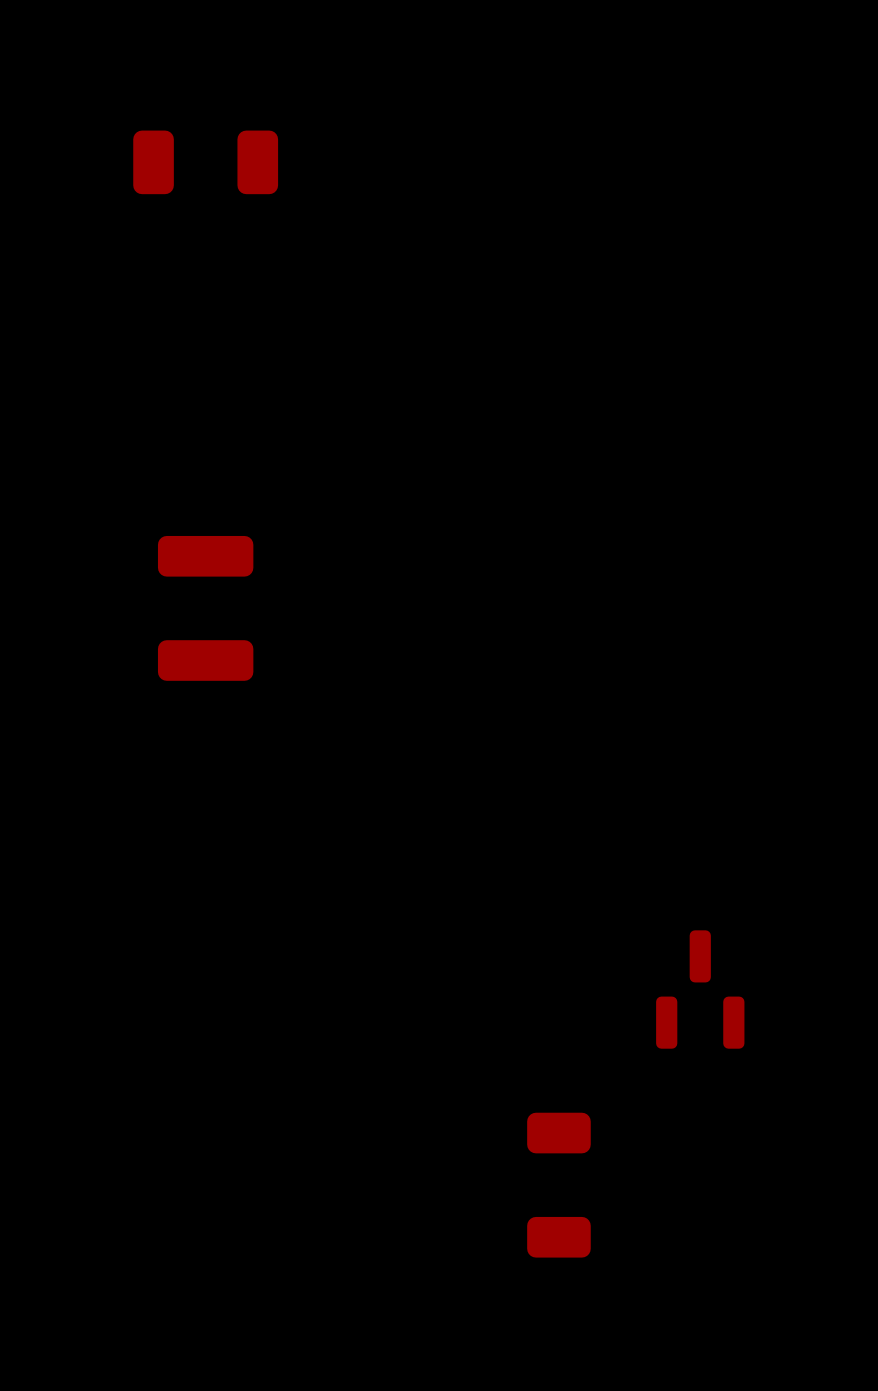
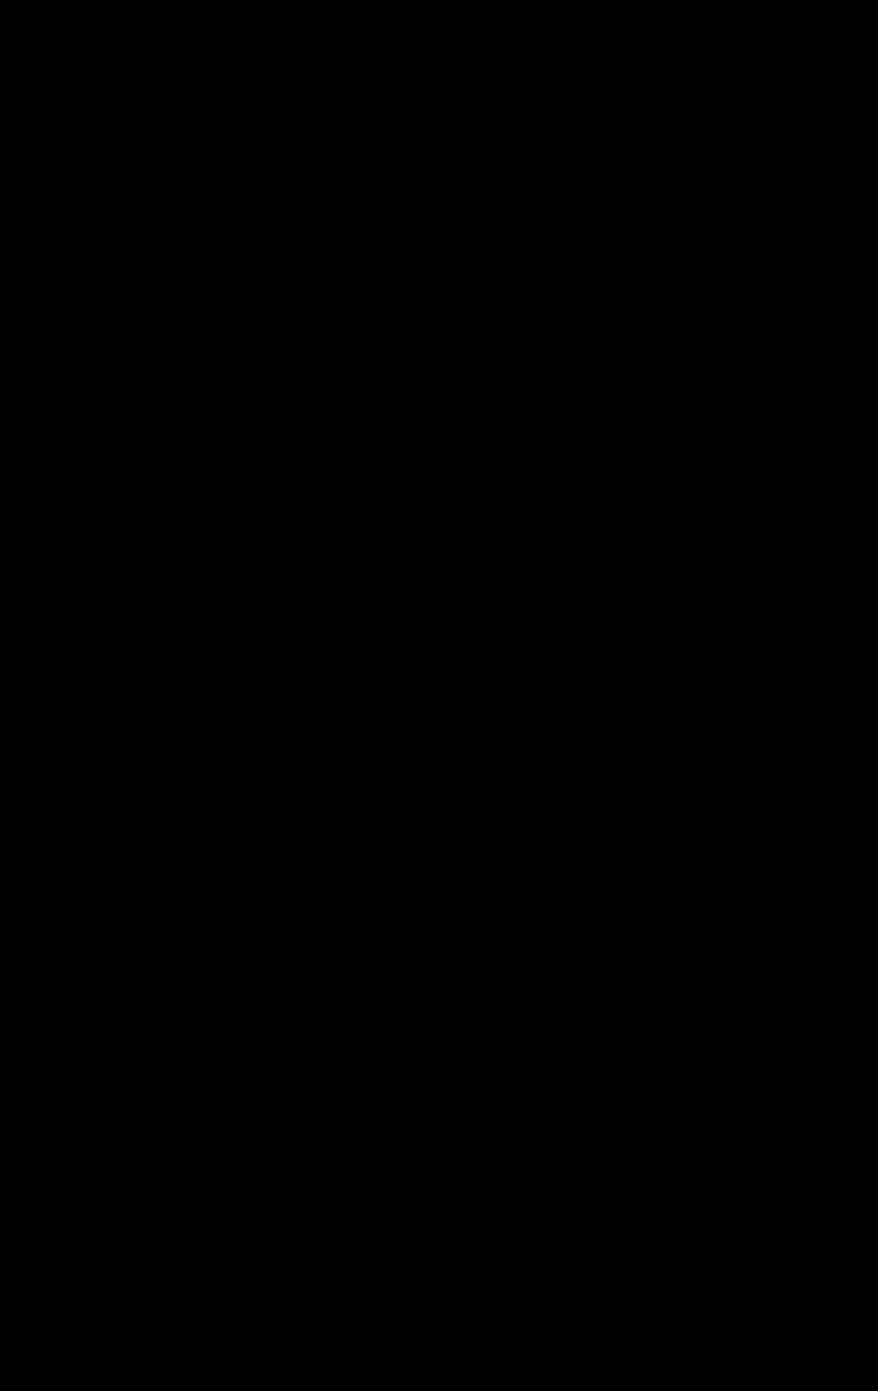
part: (205, 162) -> none
part: (205, 608) -> none
part: (700, 989) -> none
part: (558, 1185) -> none

